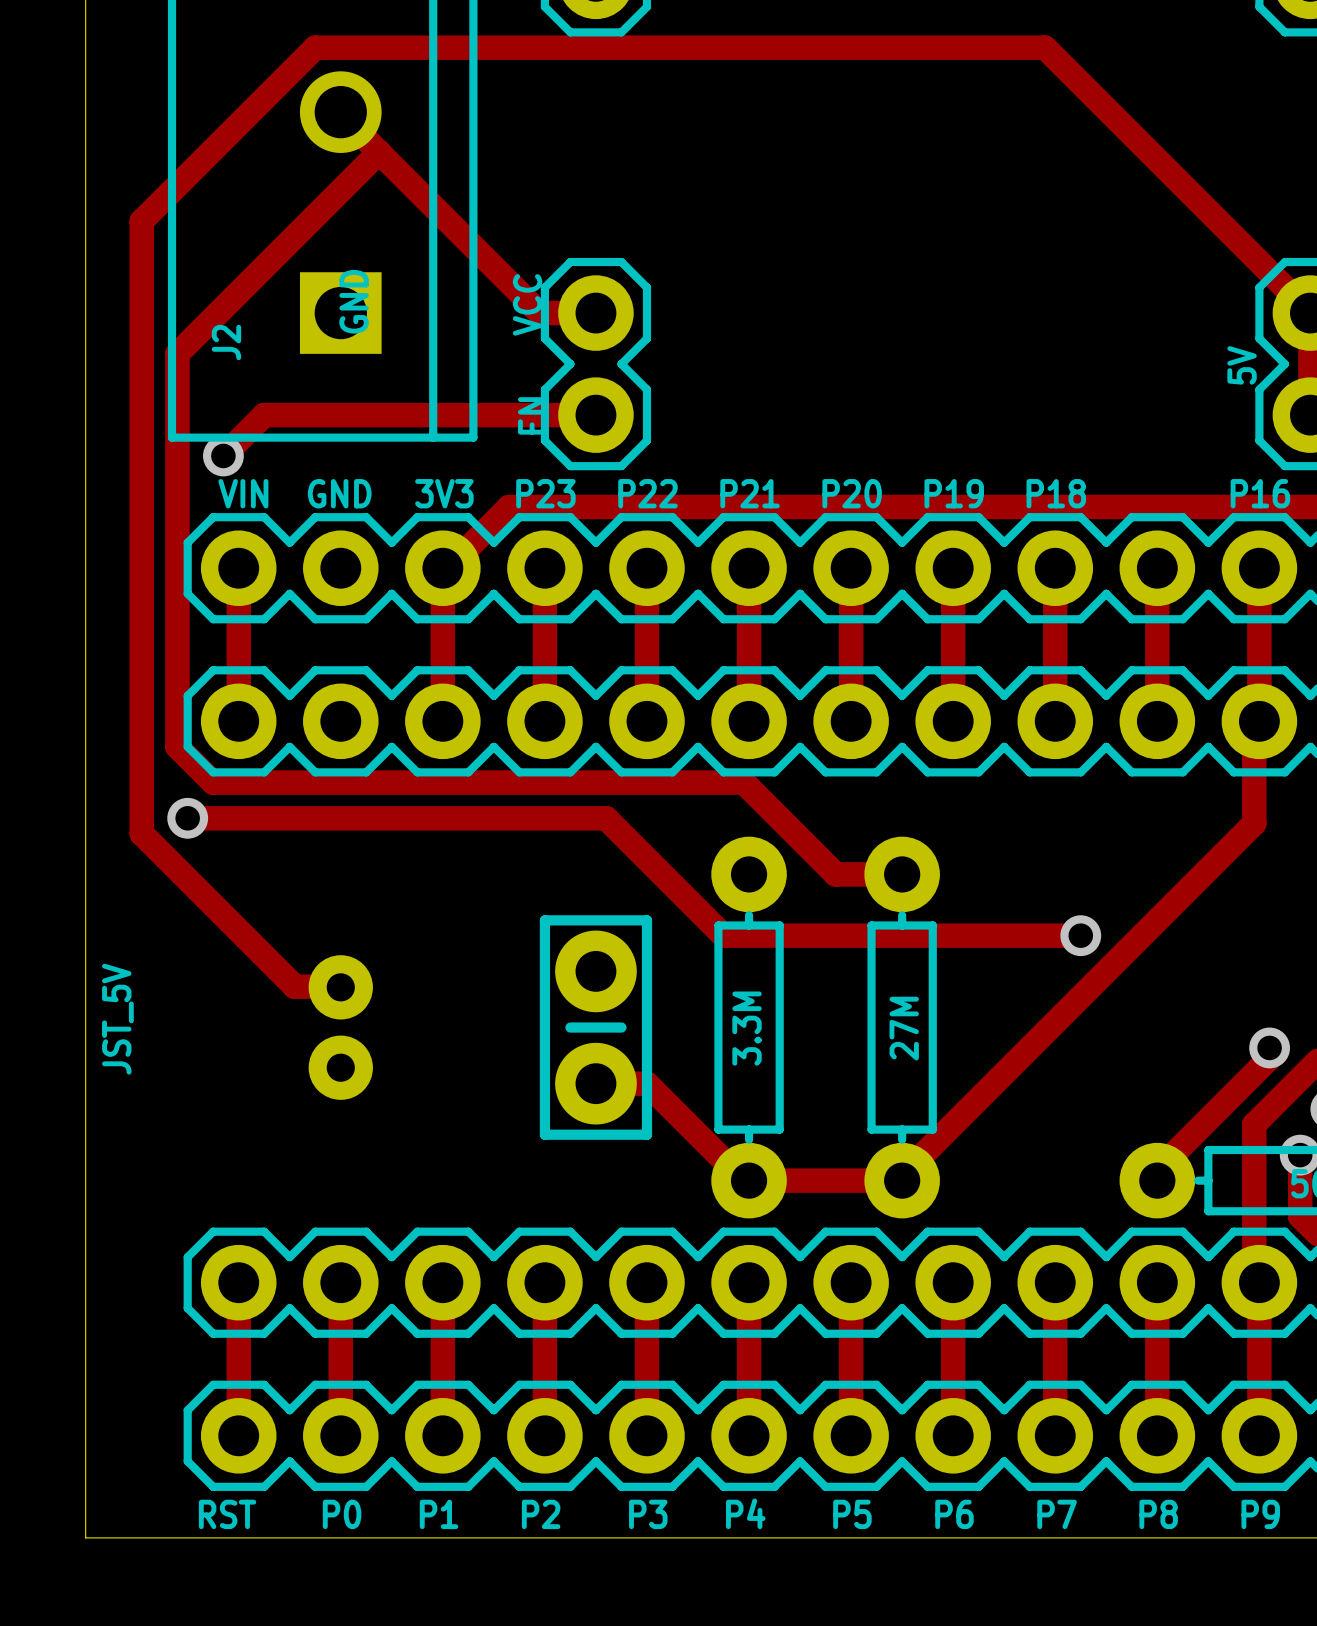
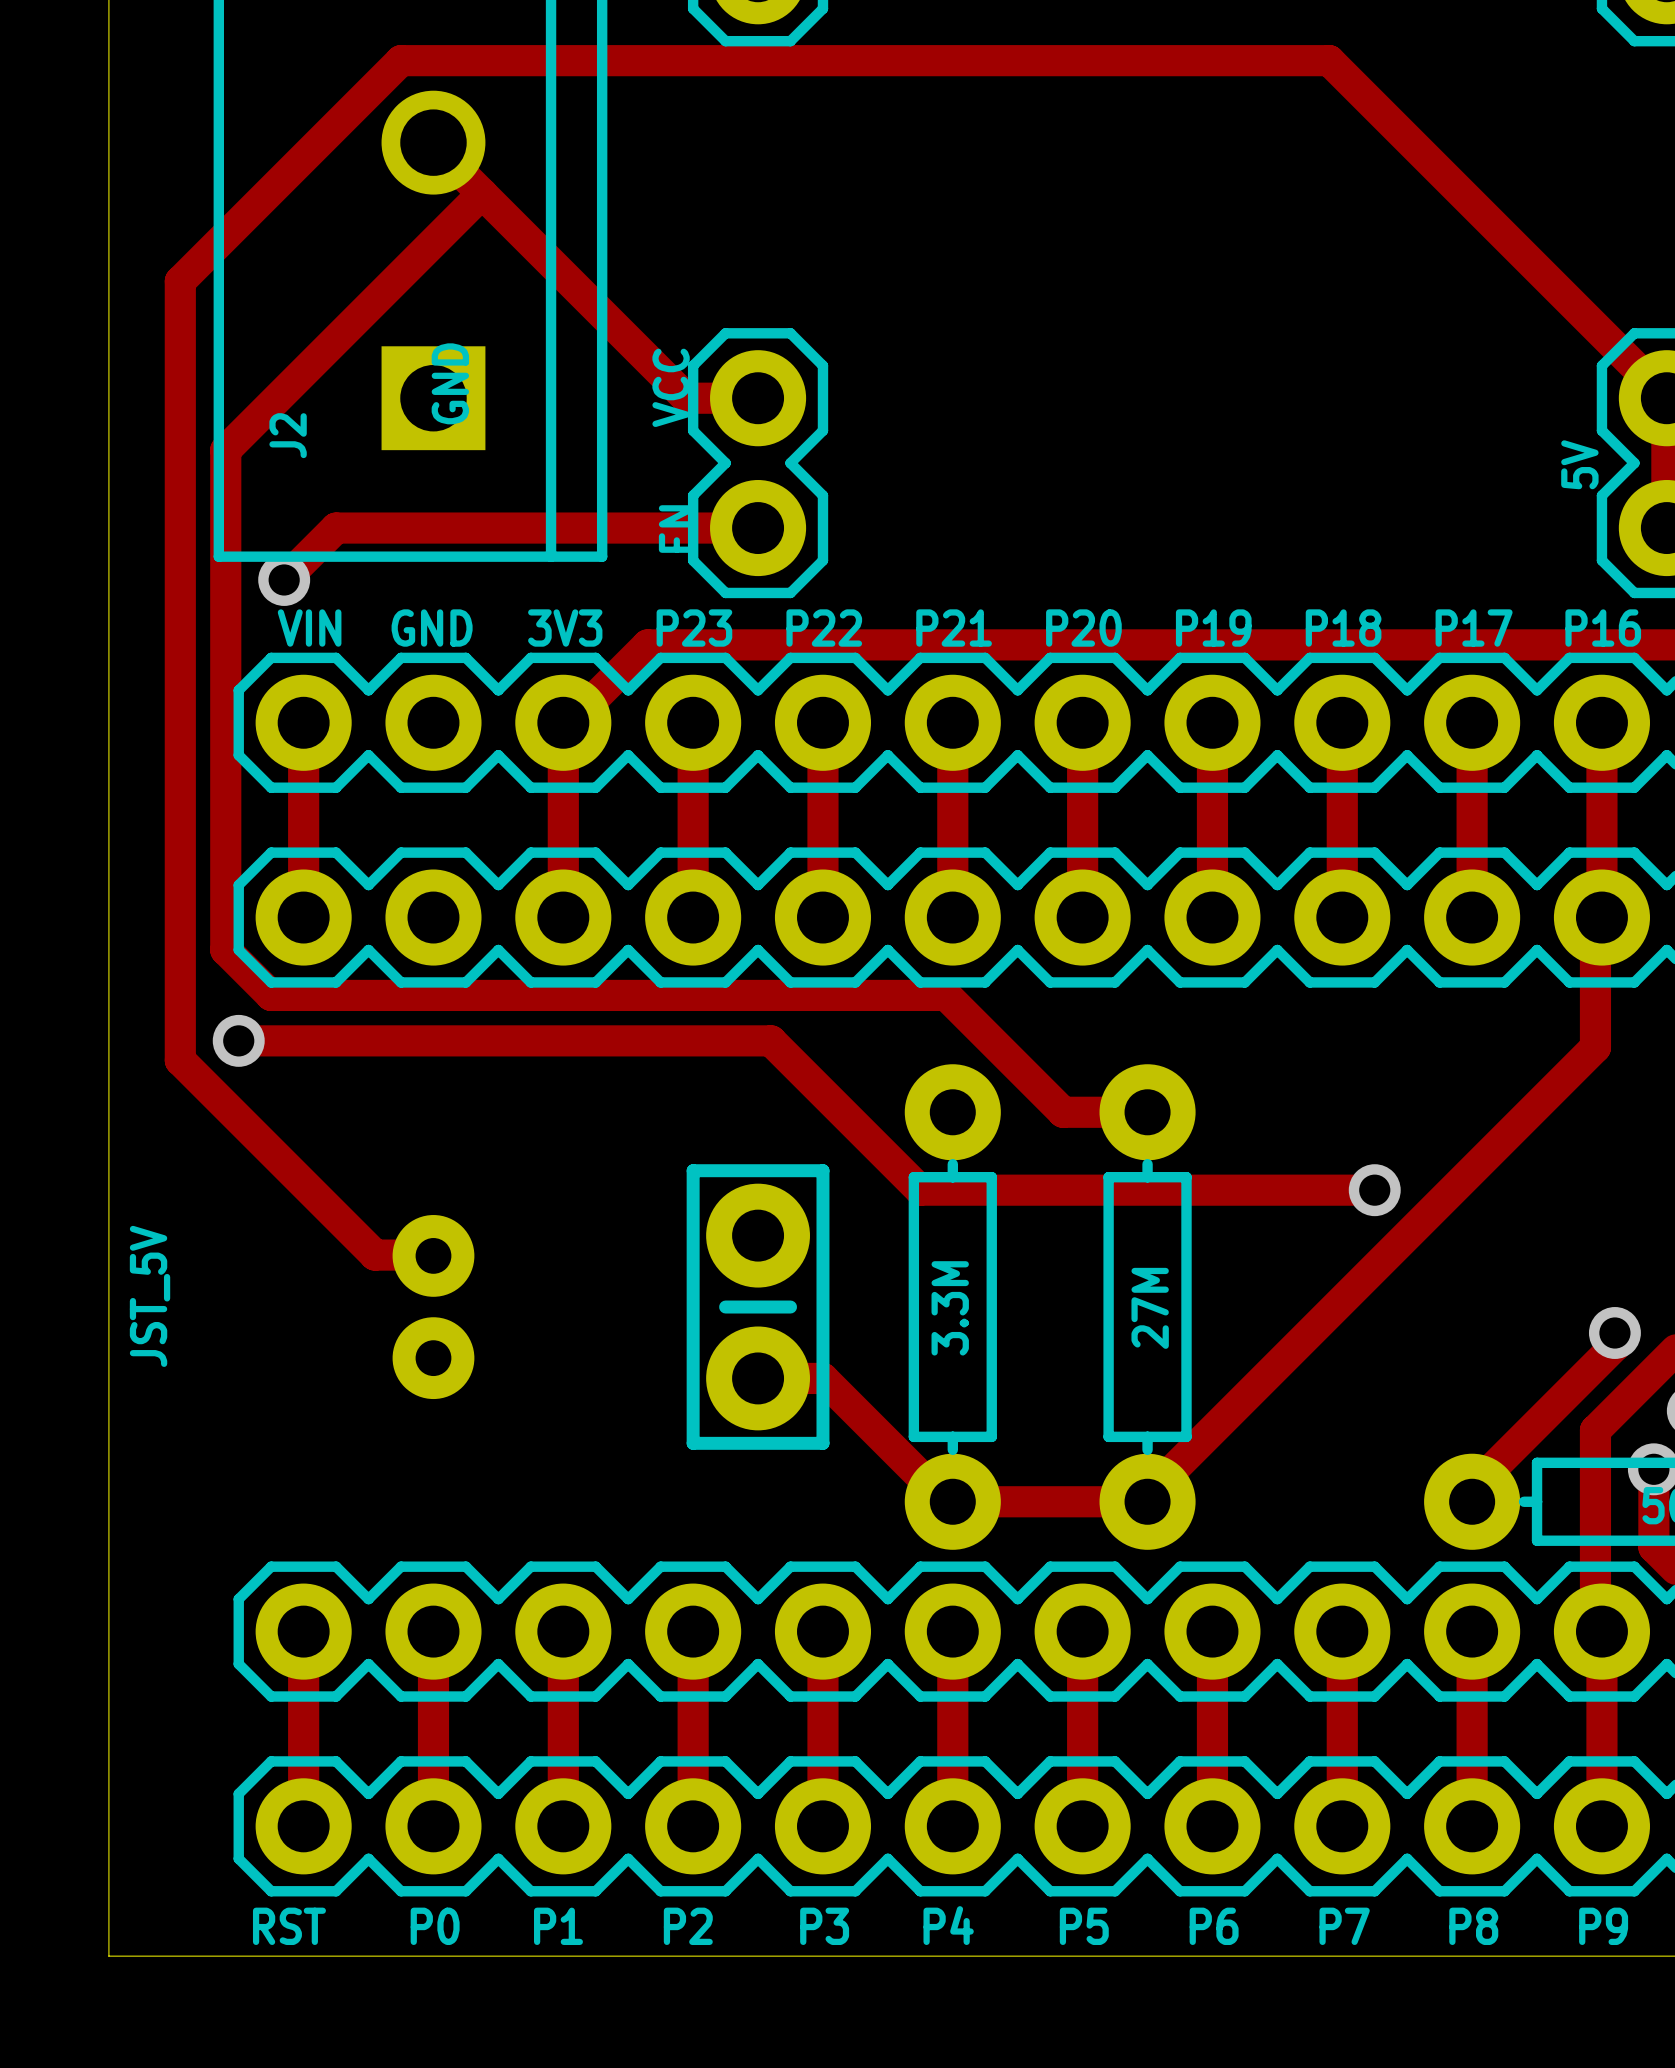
text: none -> P17 (1474, 628)

